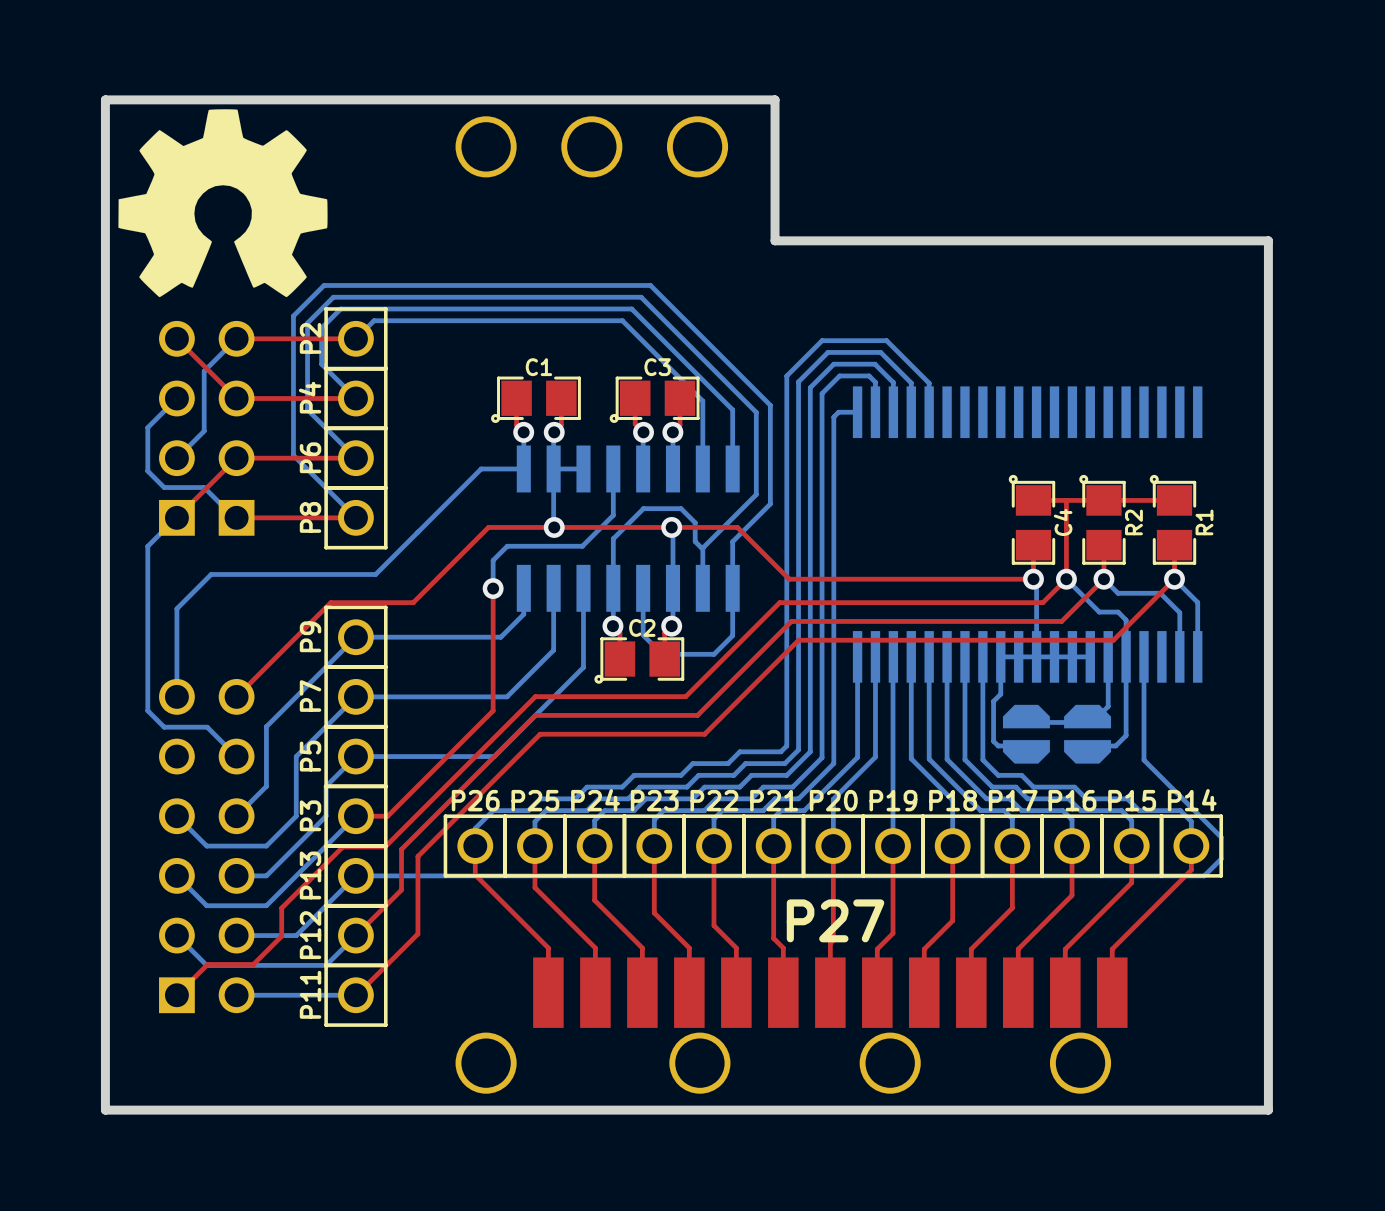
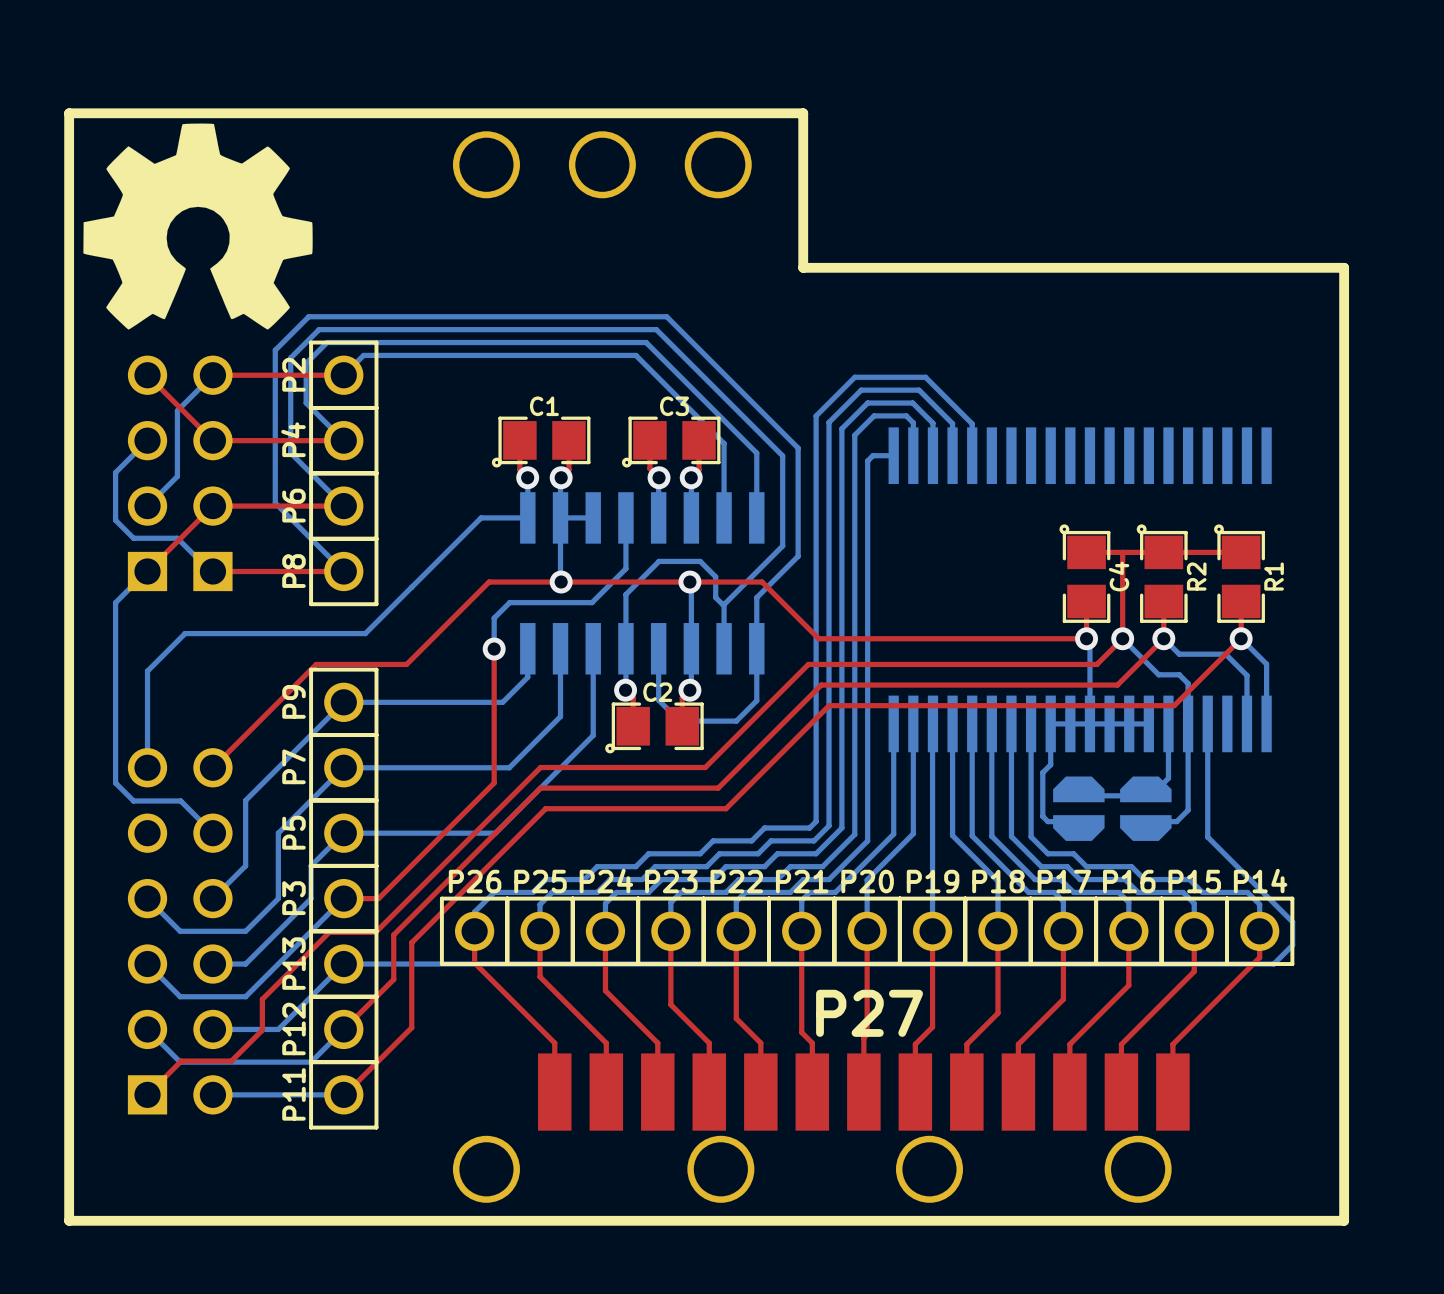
board edge: (105, 99) (105, 1110) (1268, 1110) (1268, 240) (775, 240) (775, 99) (105, 99) -> none
line: none -> (69, 113) (69, 1220) (1344, 1220) (1344, 267) (803, 267) (803, 113) (69, 113)

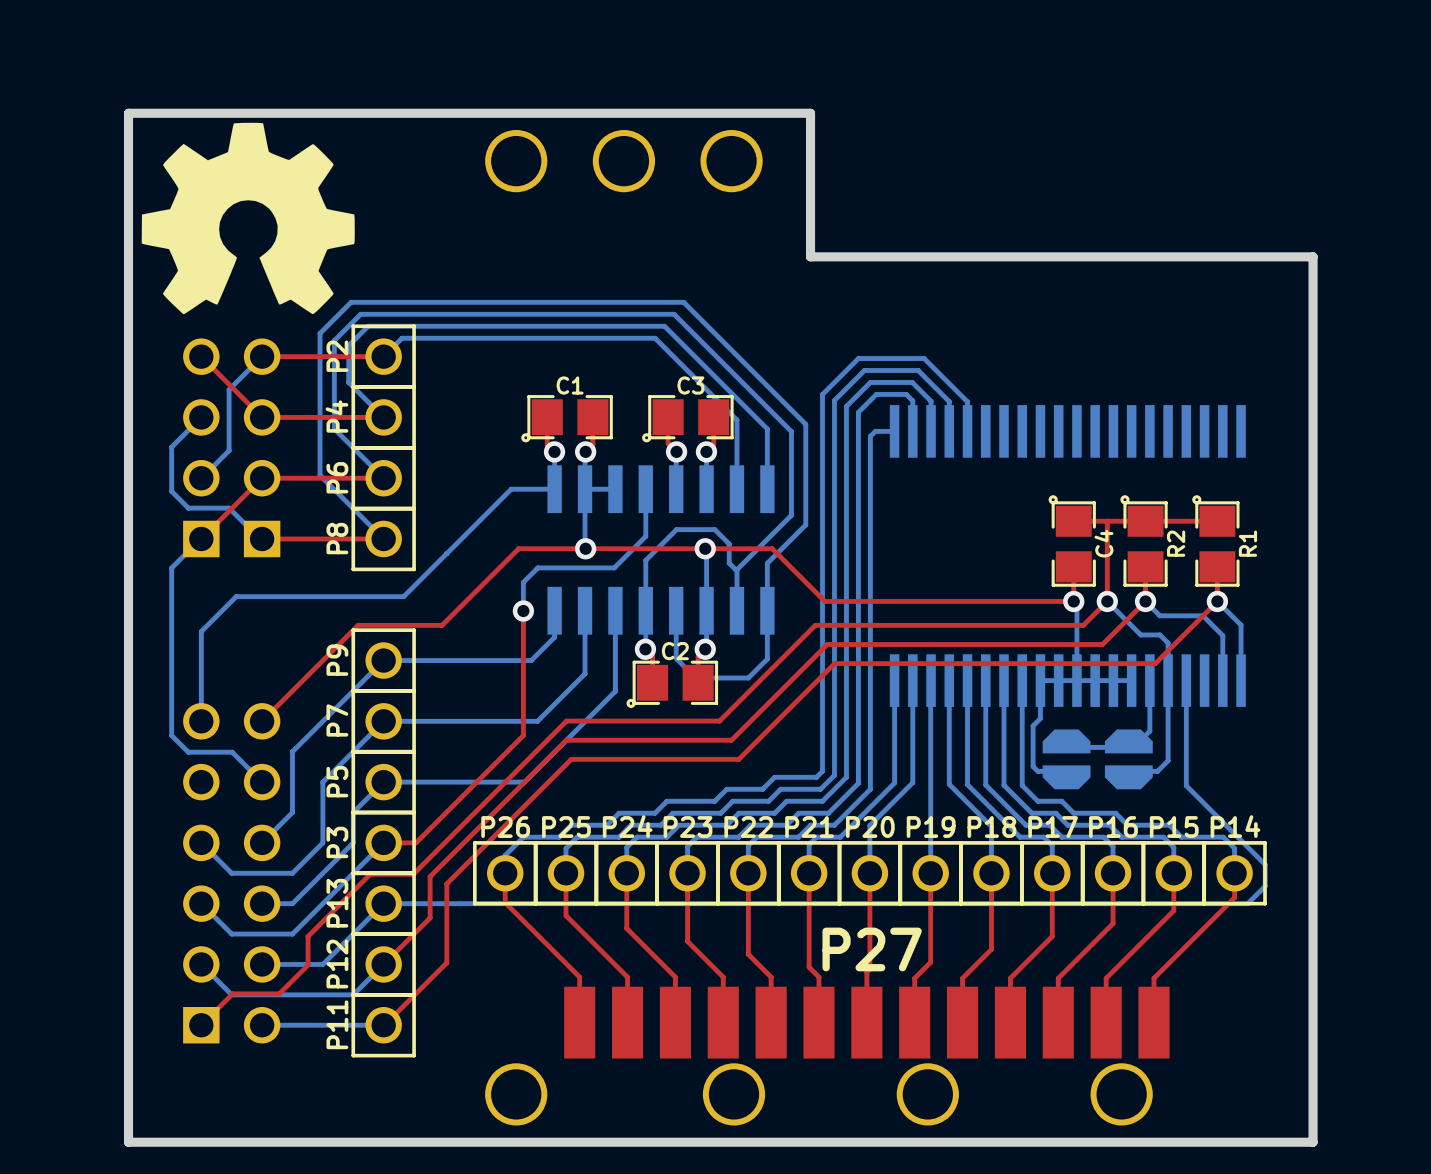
line: (69, 113) (69, 1220) (1344, 1220) (1344, 267) (803, 267) (803, 113) (69, 113) -> none
board edge: none -> (128, 113) (128, 1142) (1313, 1142) (1313, 256) (810, 256) (810, 113) (128, 113)

